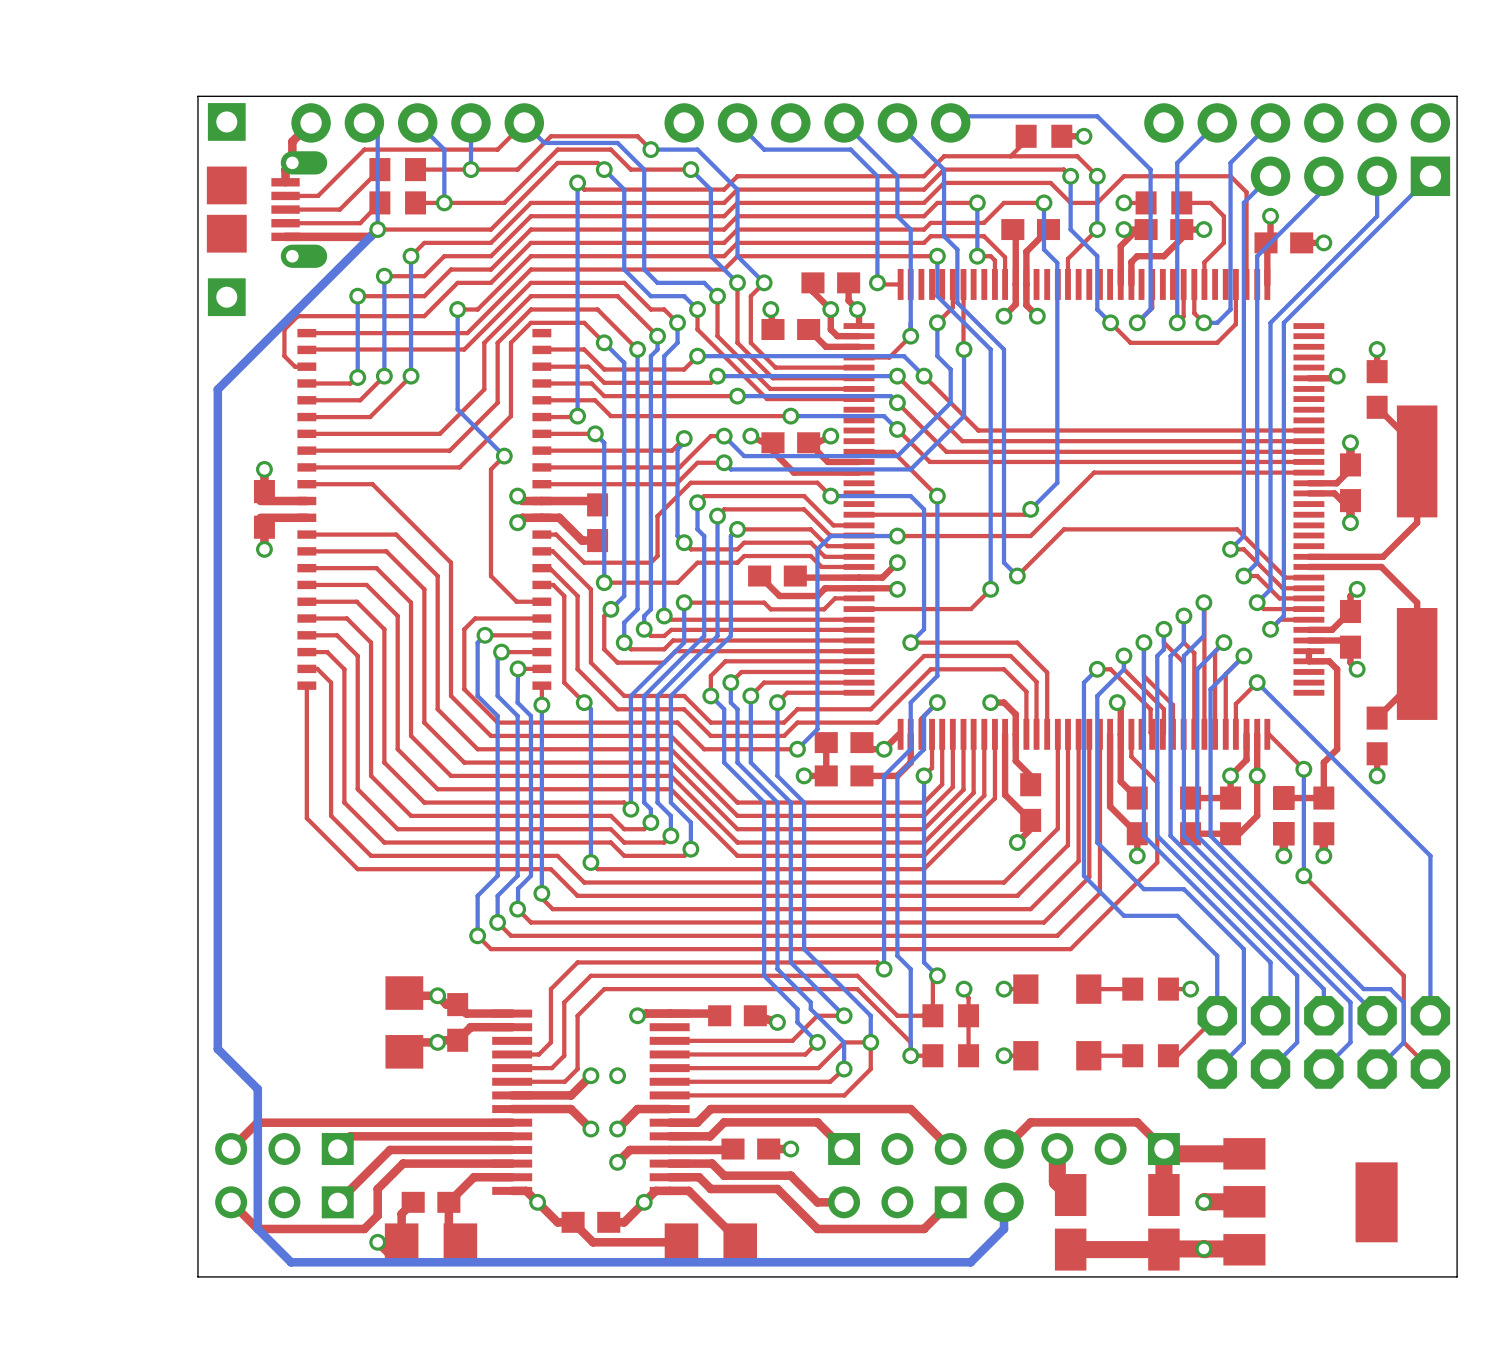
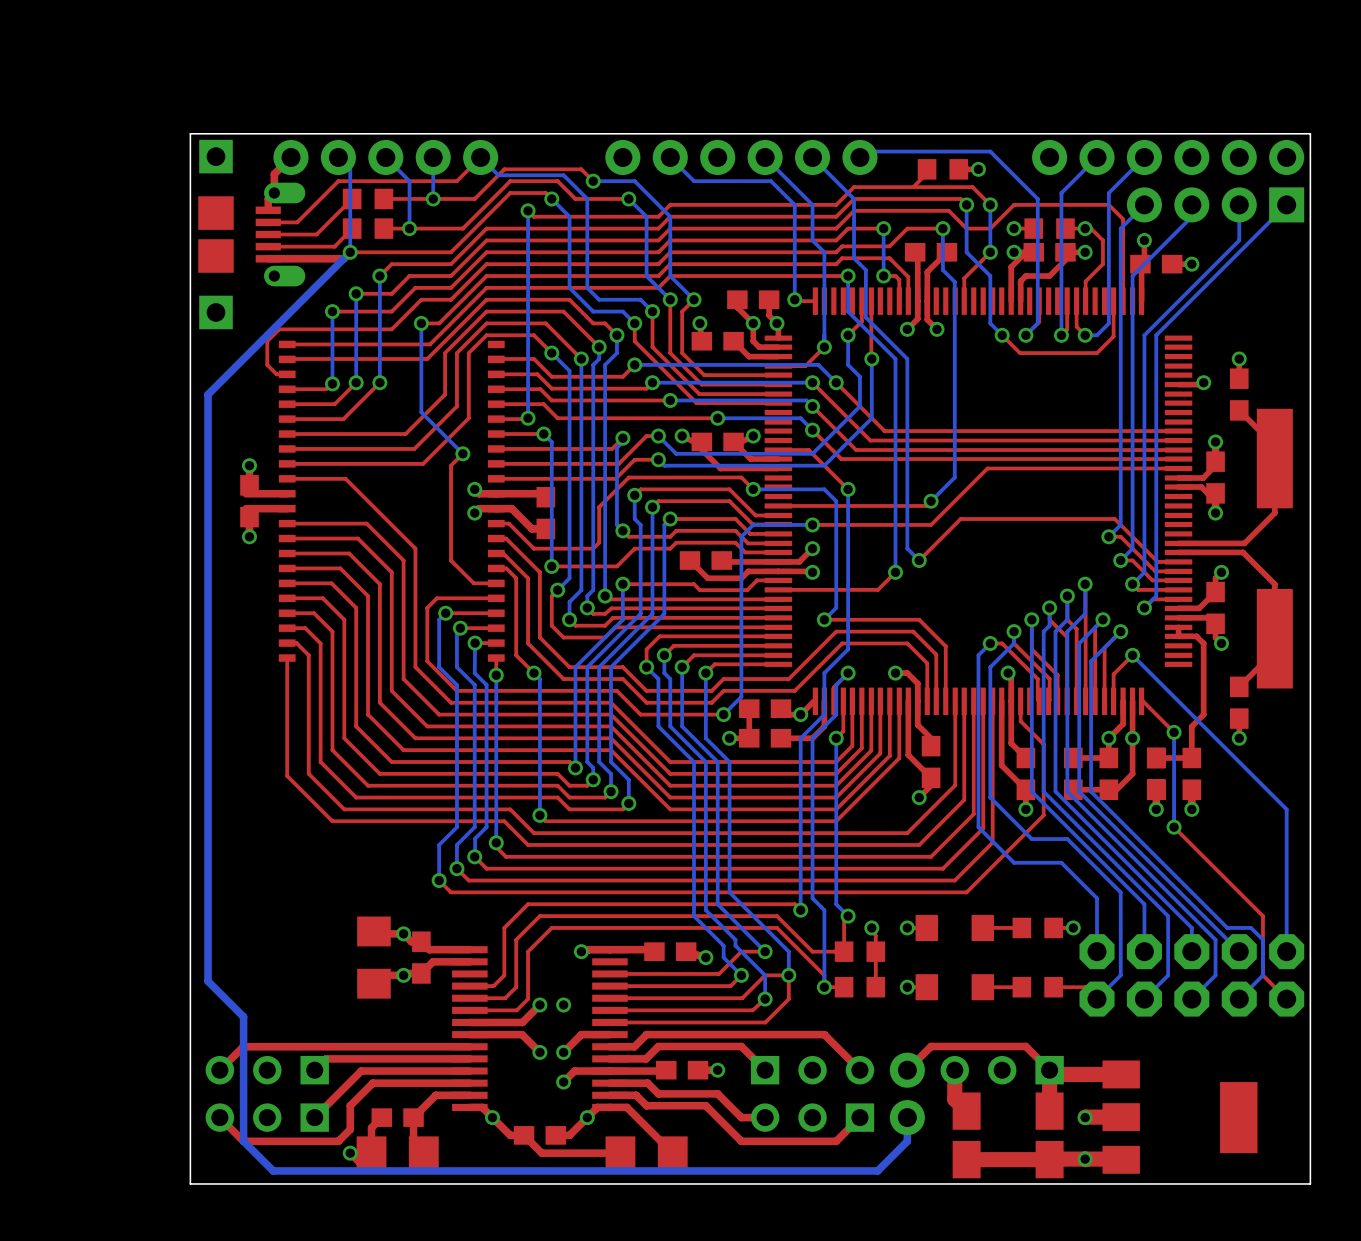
via: none -> (1085, 228)
top track: (1217, 1015) (1177, 1055) -> (1097, 999) (1085, 987) (1061, 987)

